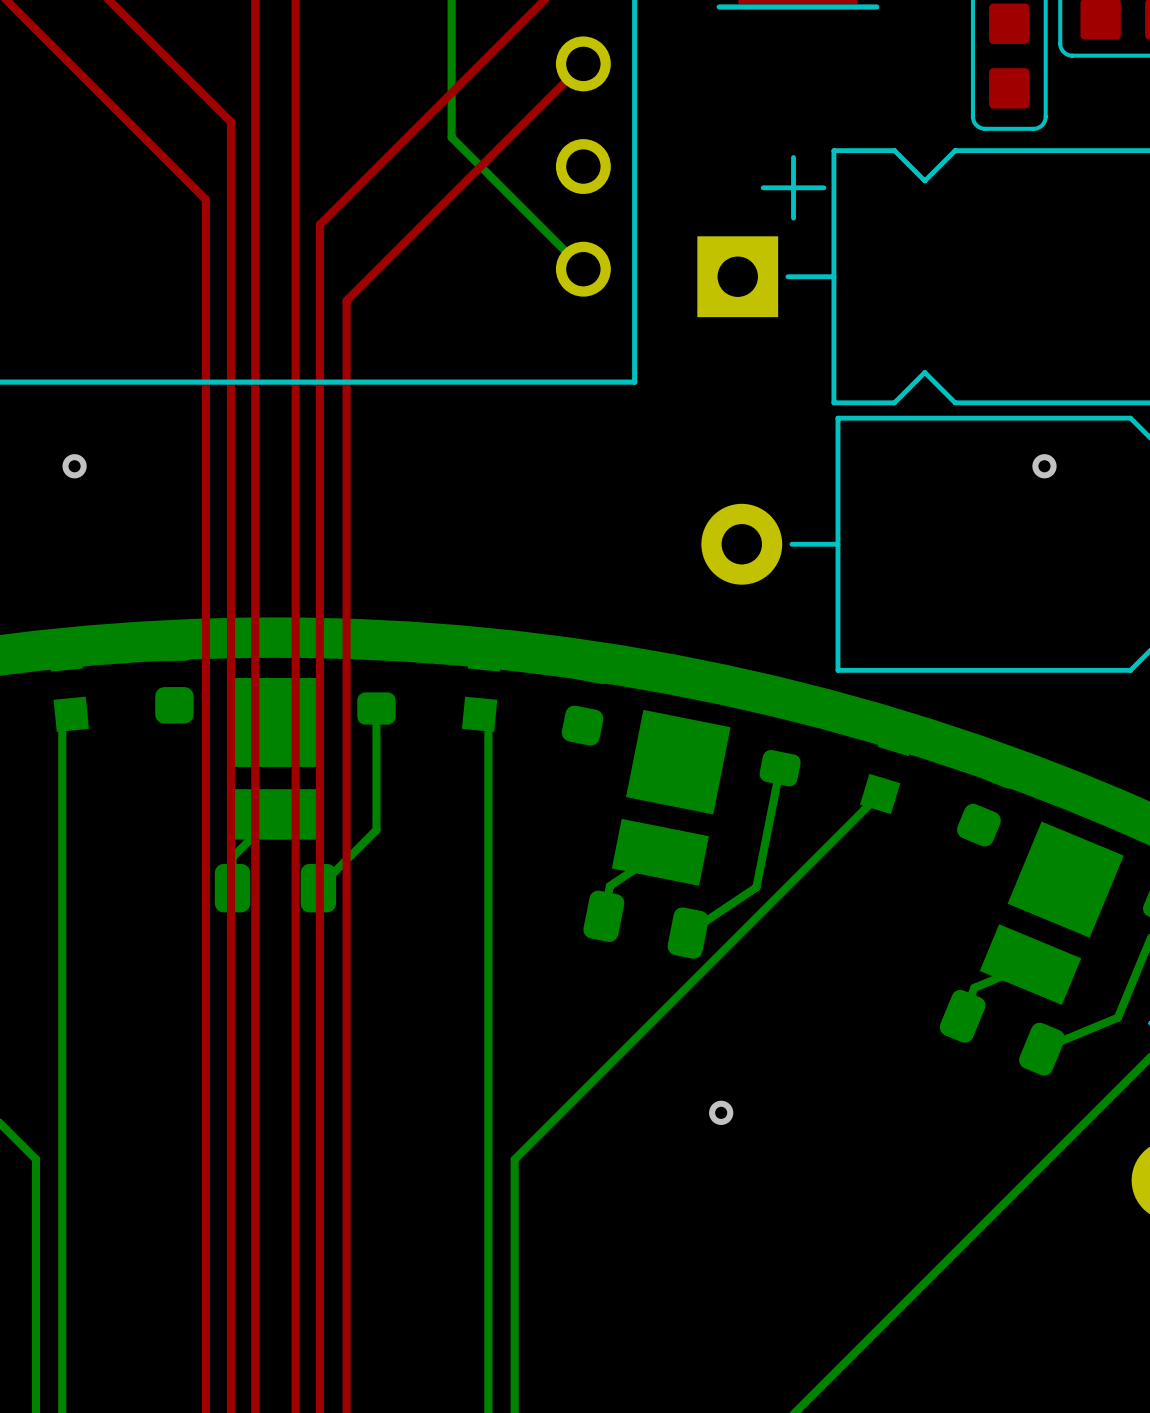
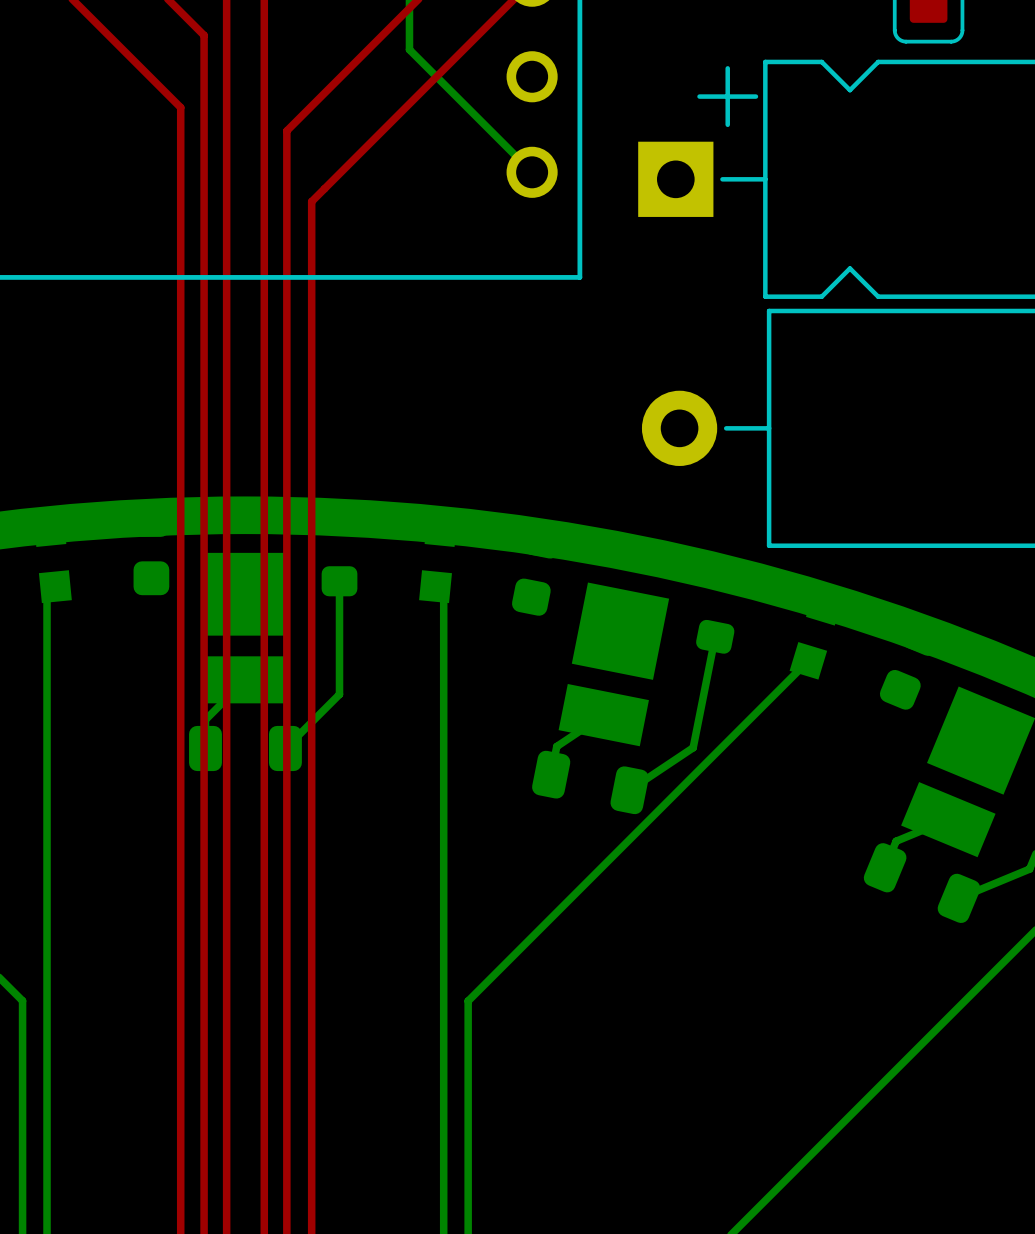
via: (74, 466) -> none
via: (1044, 466) -> none
via: (721, 1112) -> none

